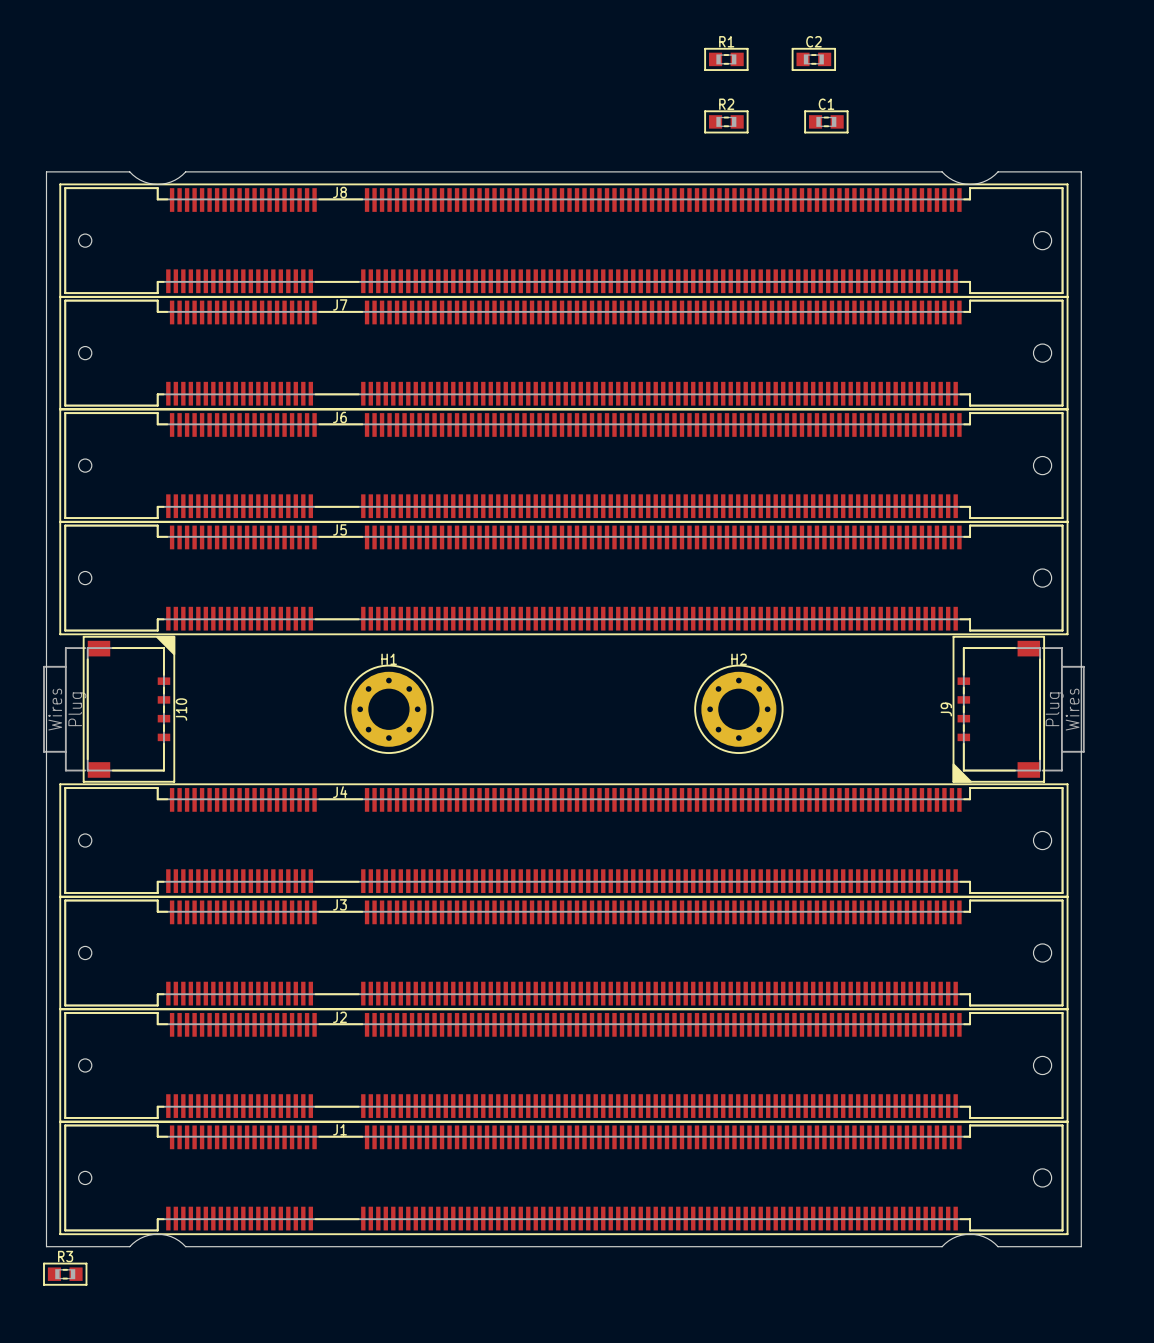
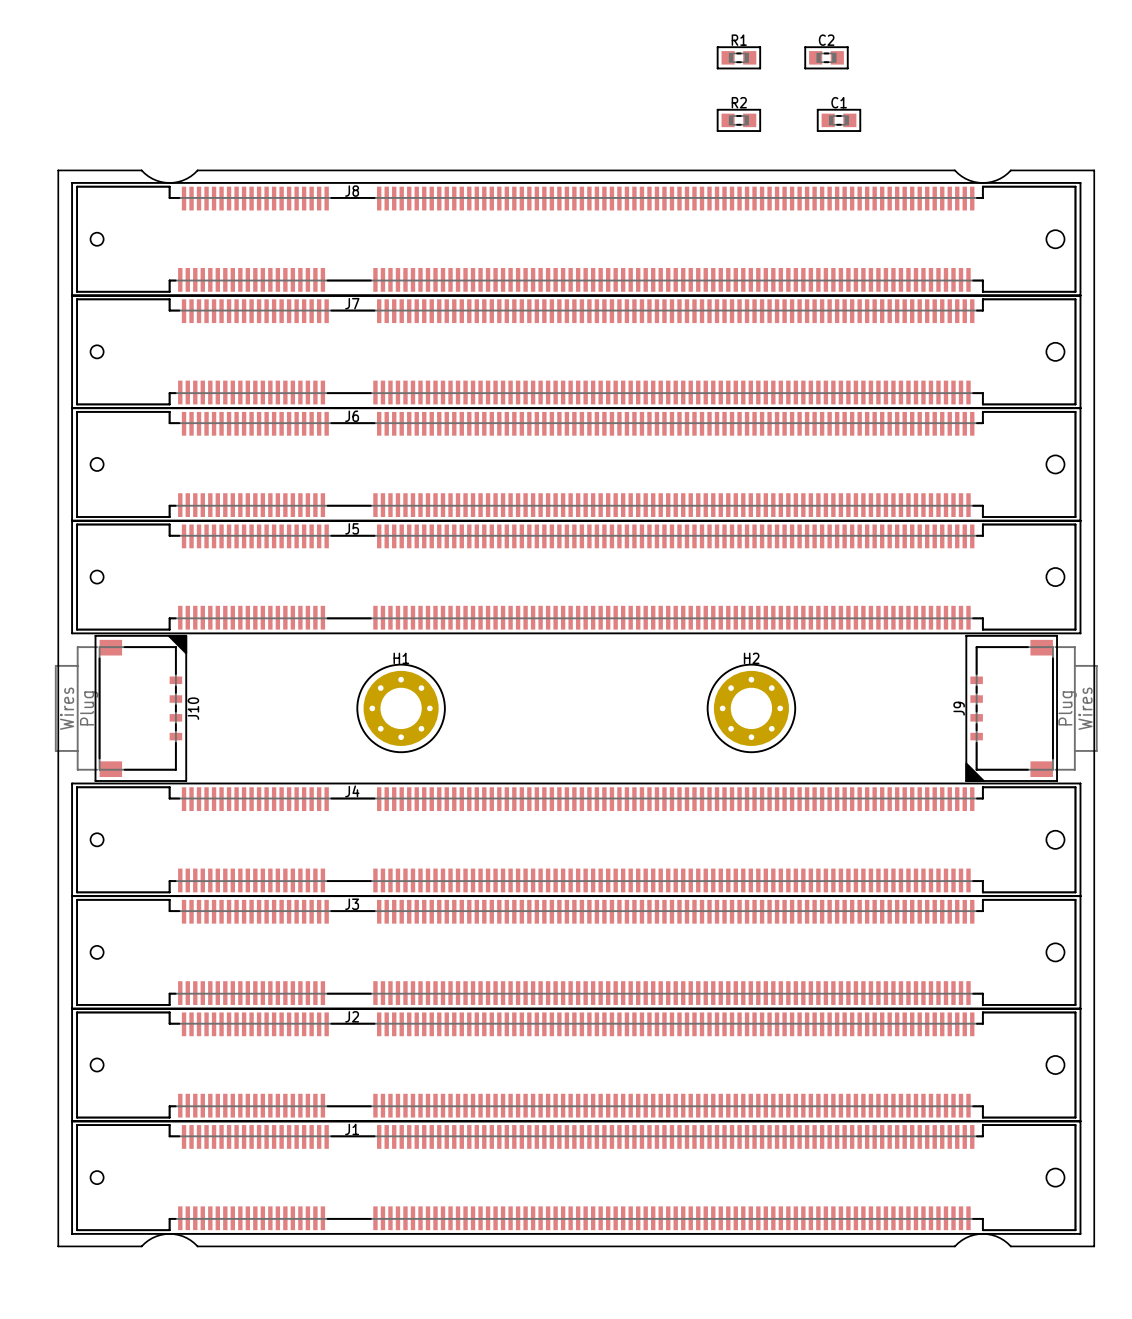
R3: (65, 1274) -> none

